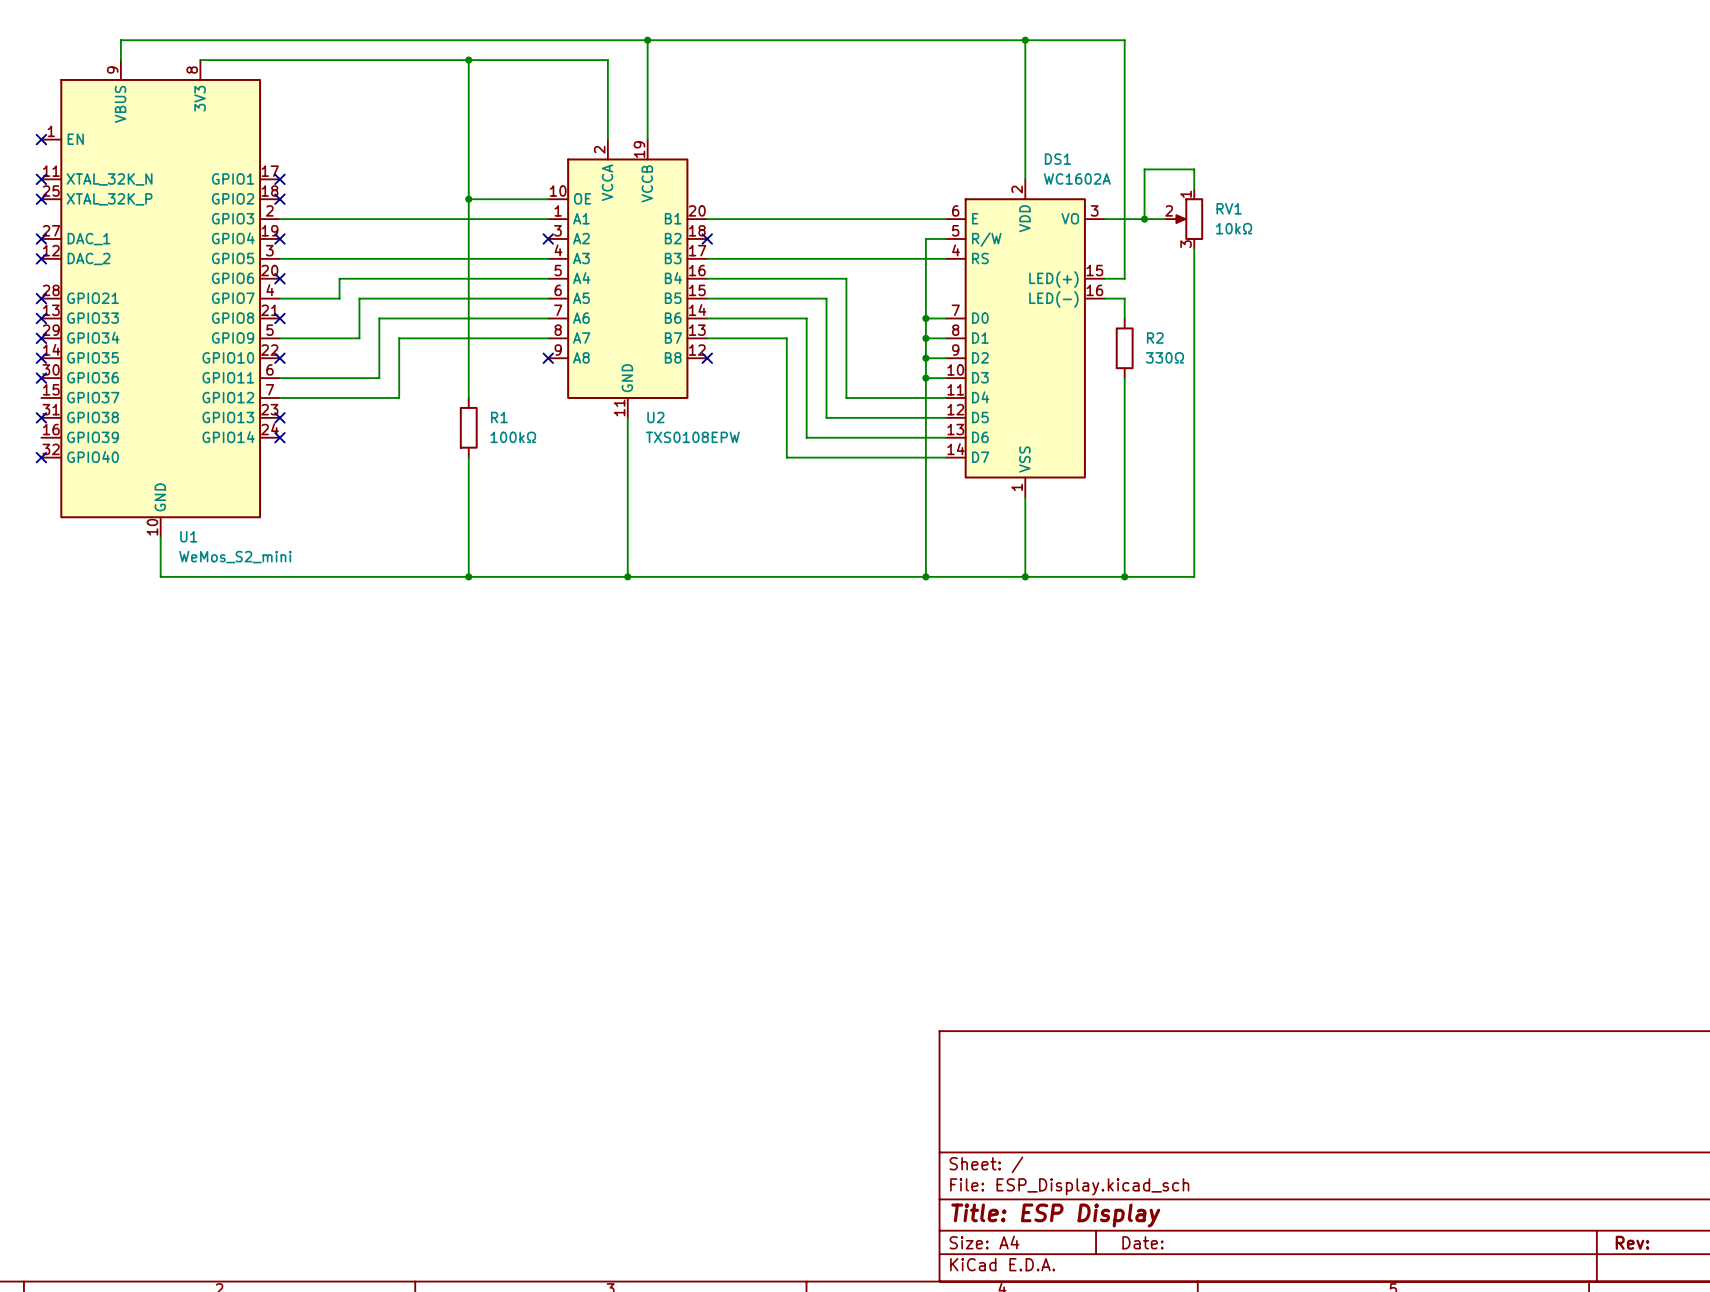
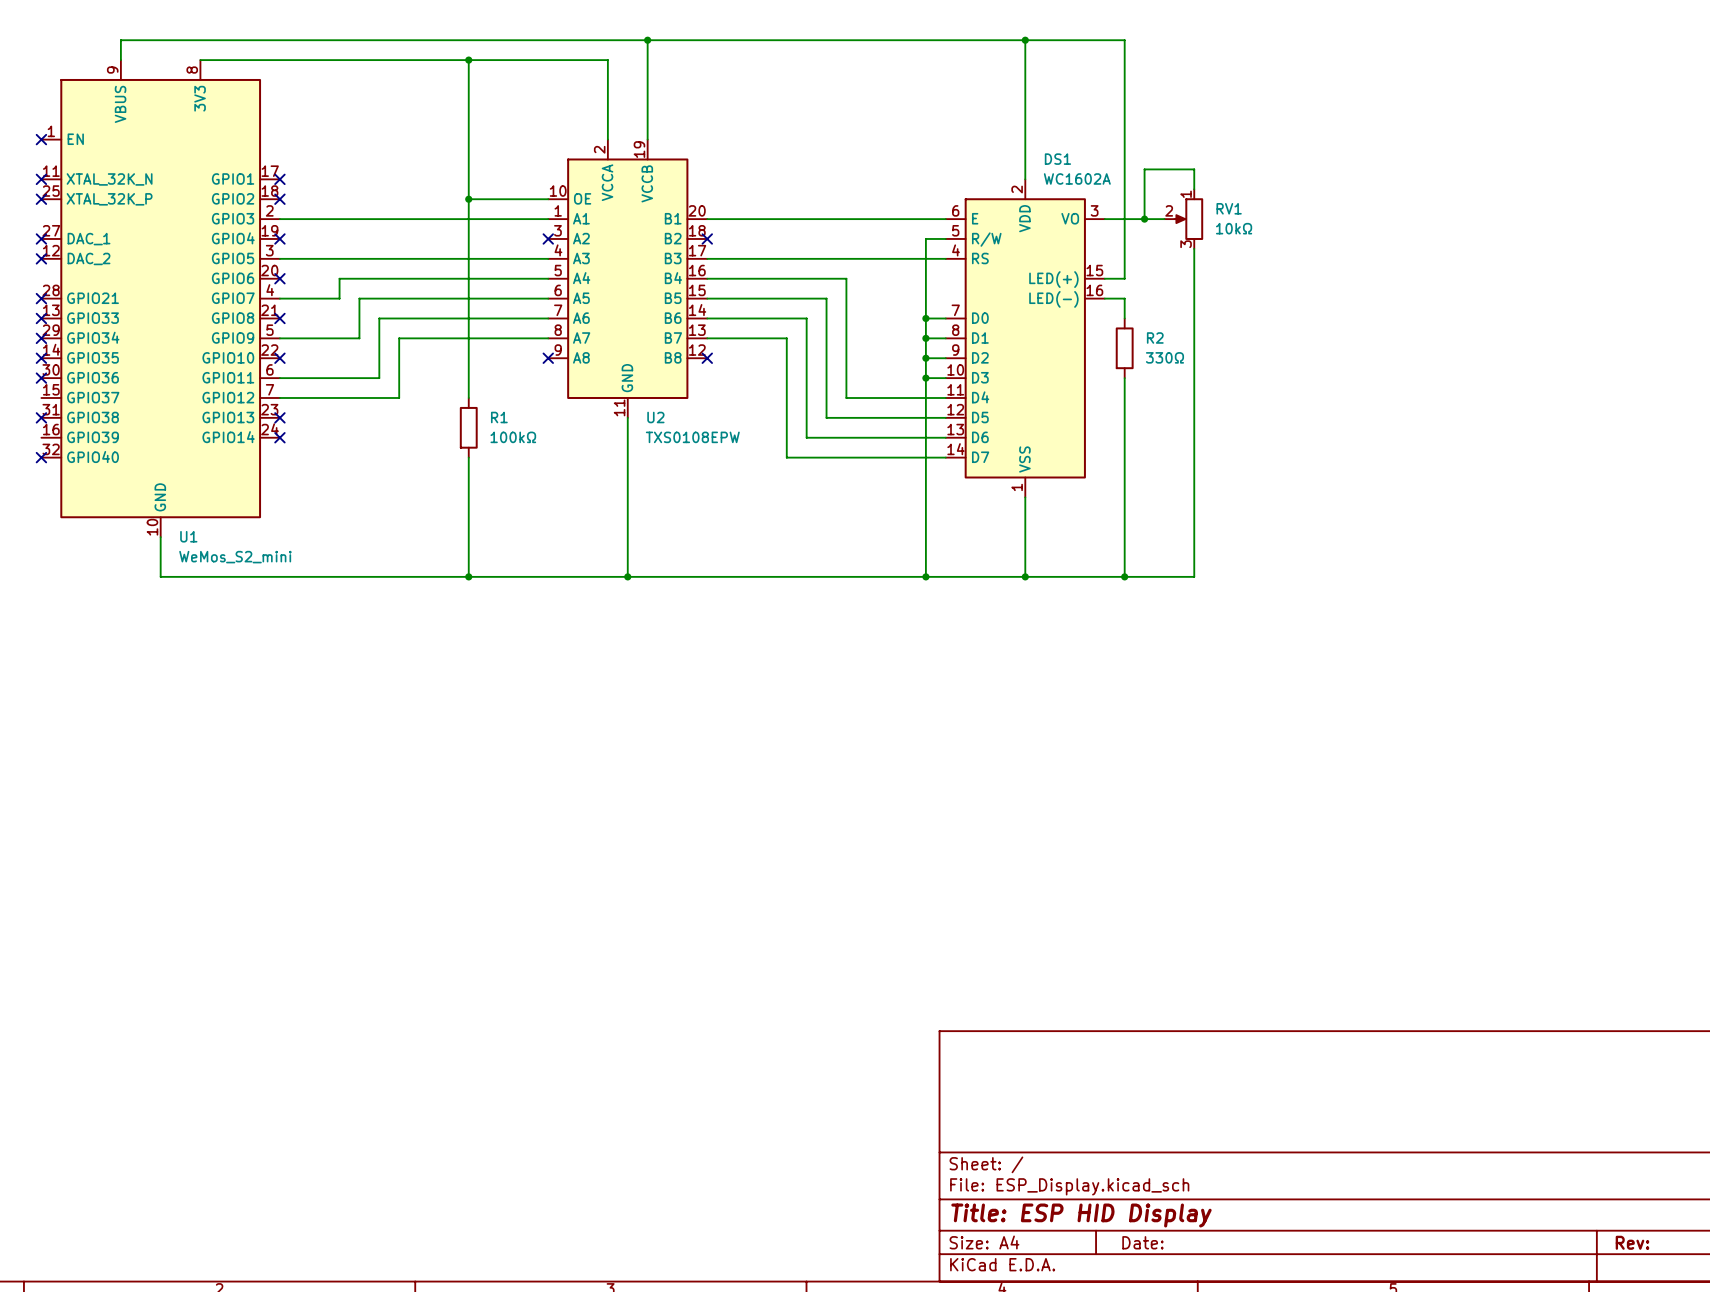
title block: Title: ESP Display (1055, 1215) -> Title: ESP HID Display (1081, 1215)

